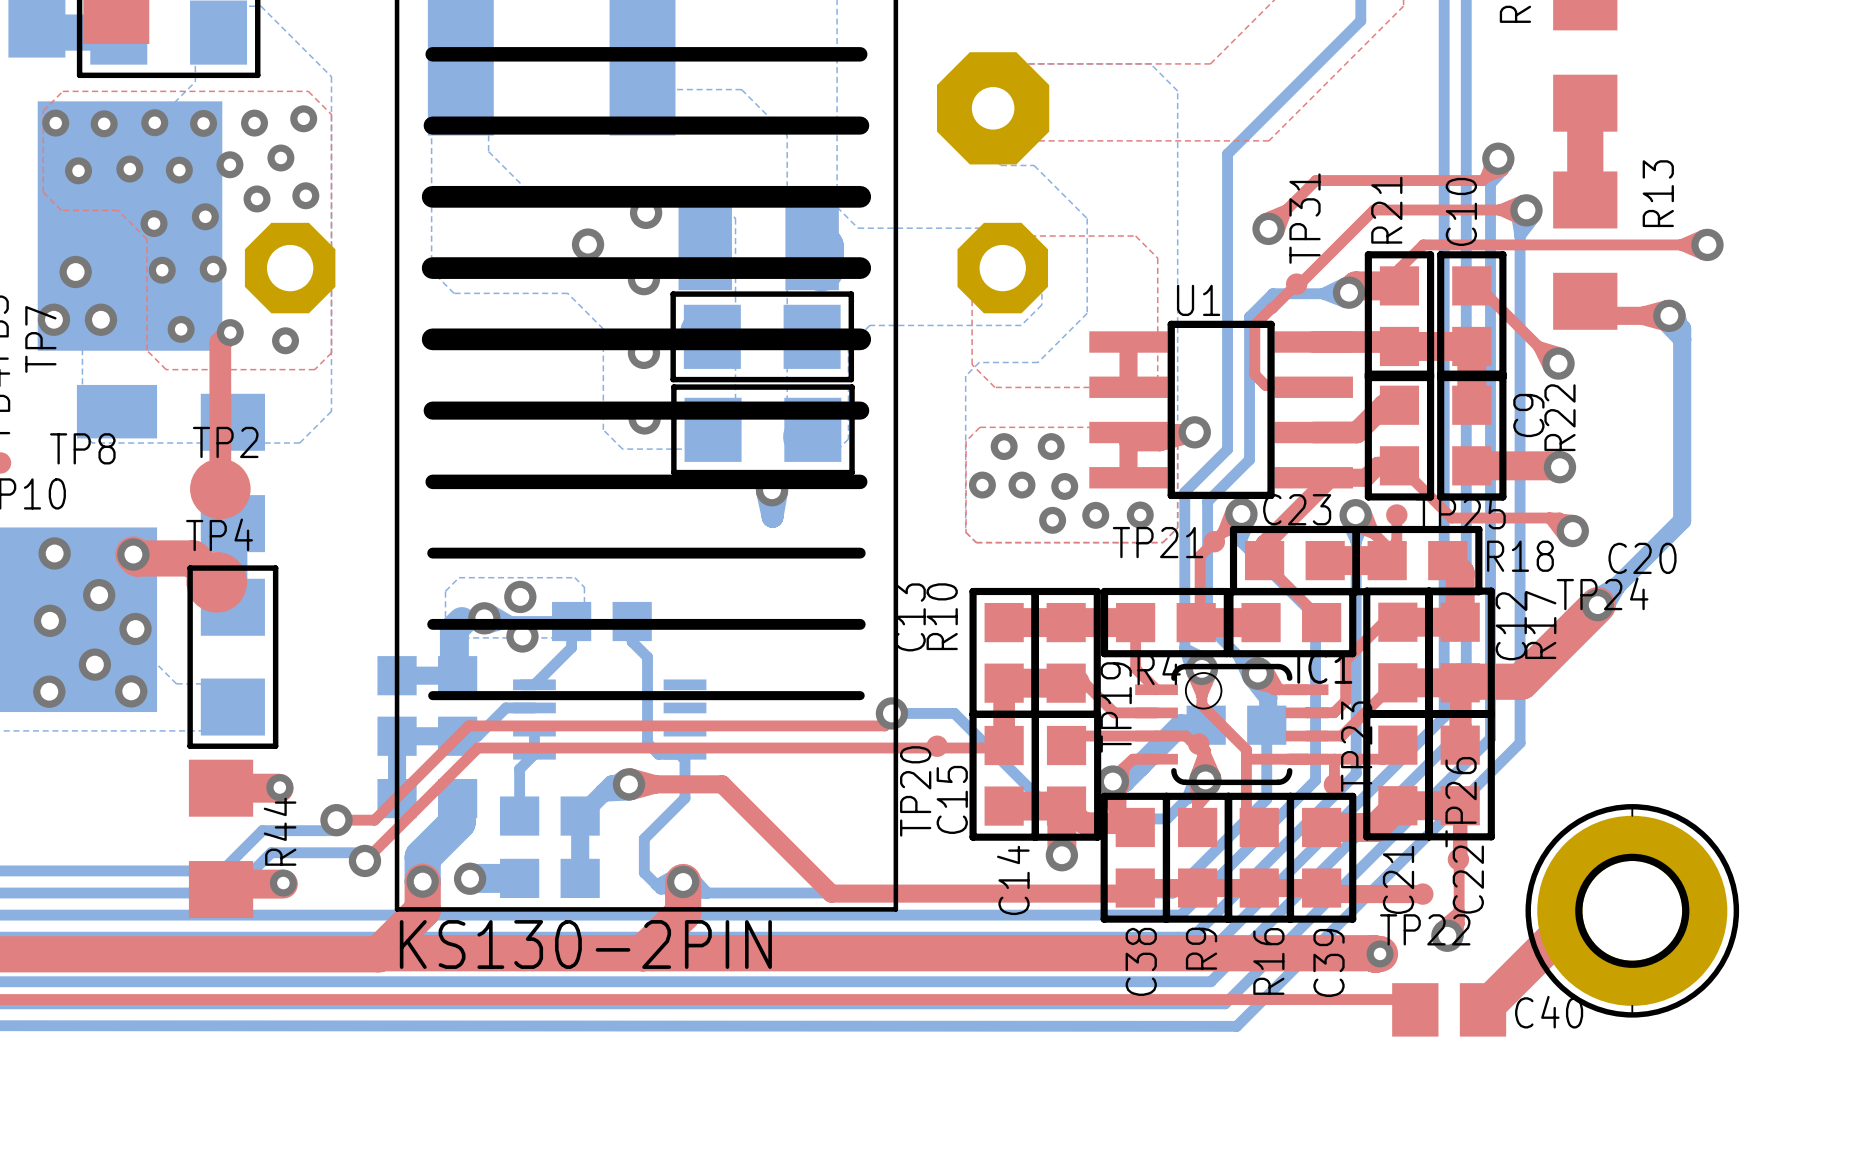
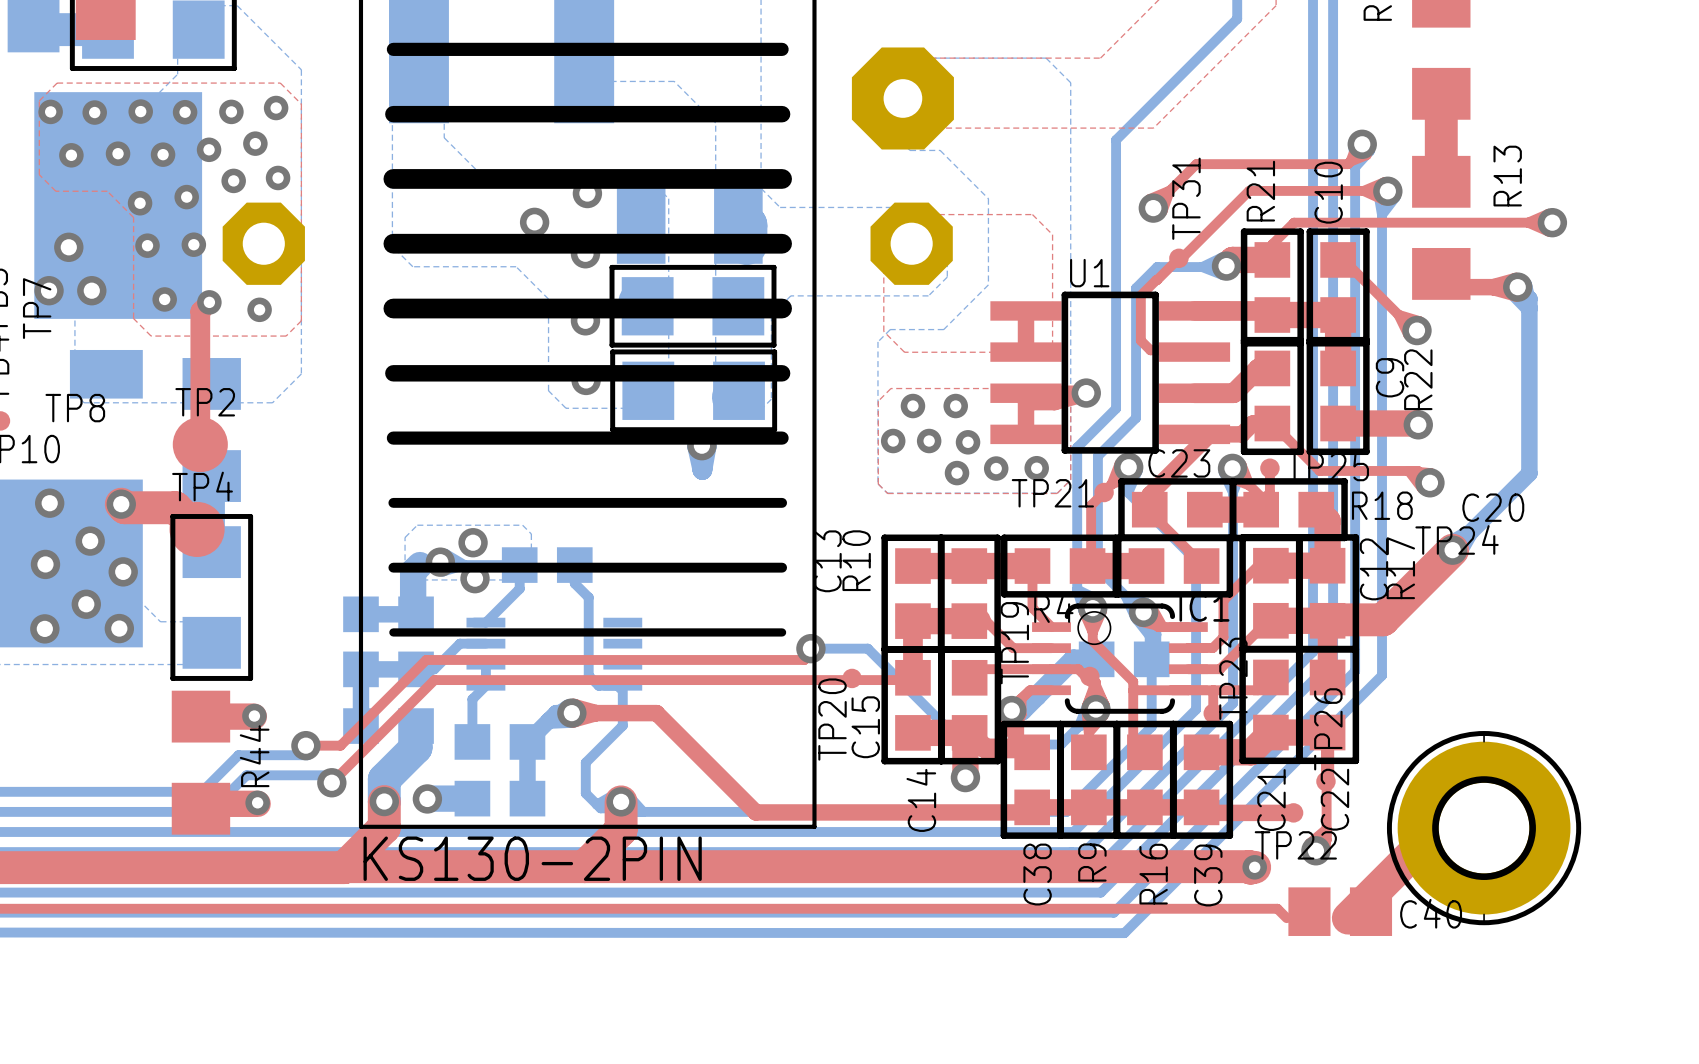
TP4 name position: TP4 (219, 534) -> TP4 (202, 486)
C40 position: (1449, 1009) -> (1340, 911)

